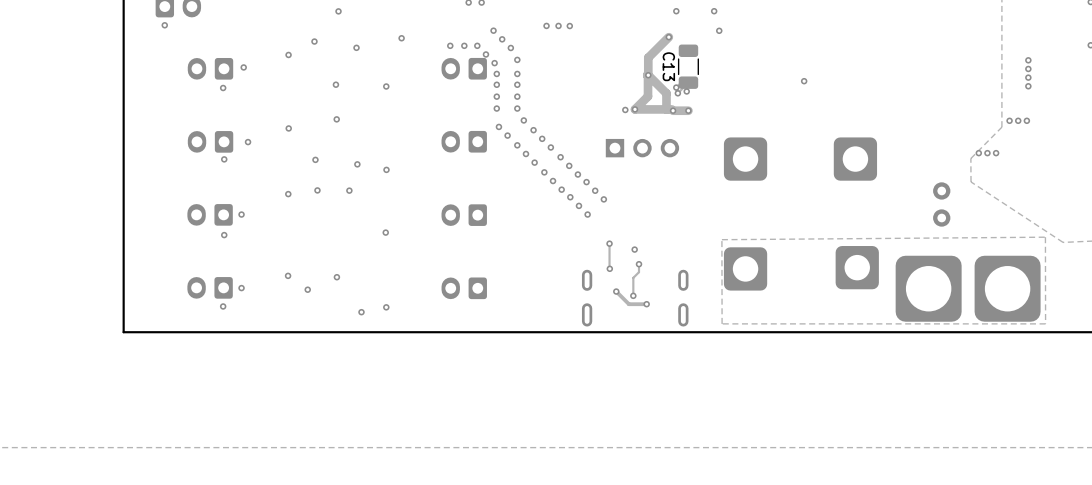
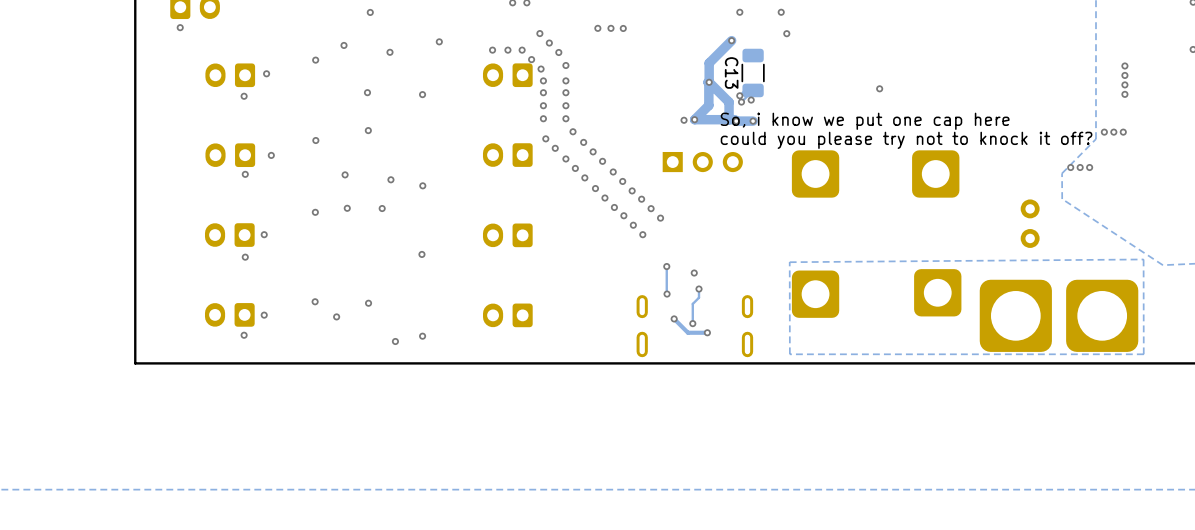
text: none -> So, i know we put one cap here (865, 121)
text: none -> could you please try not to knock it off? (906, 140)

